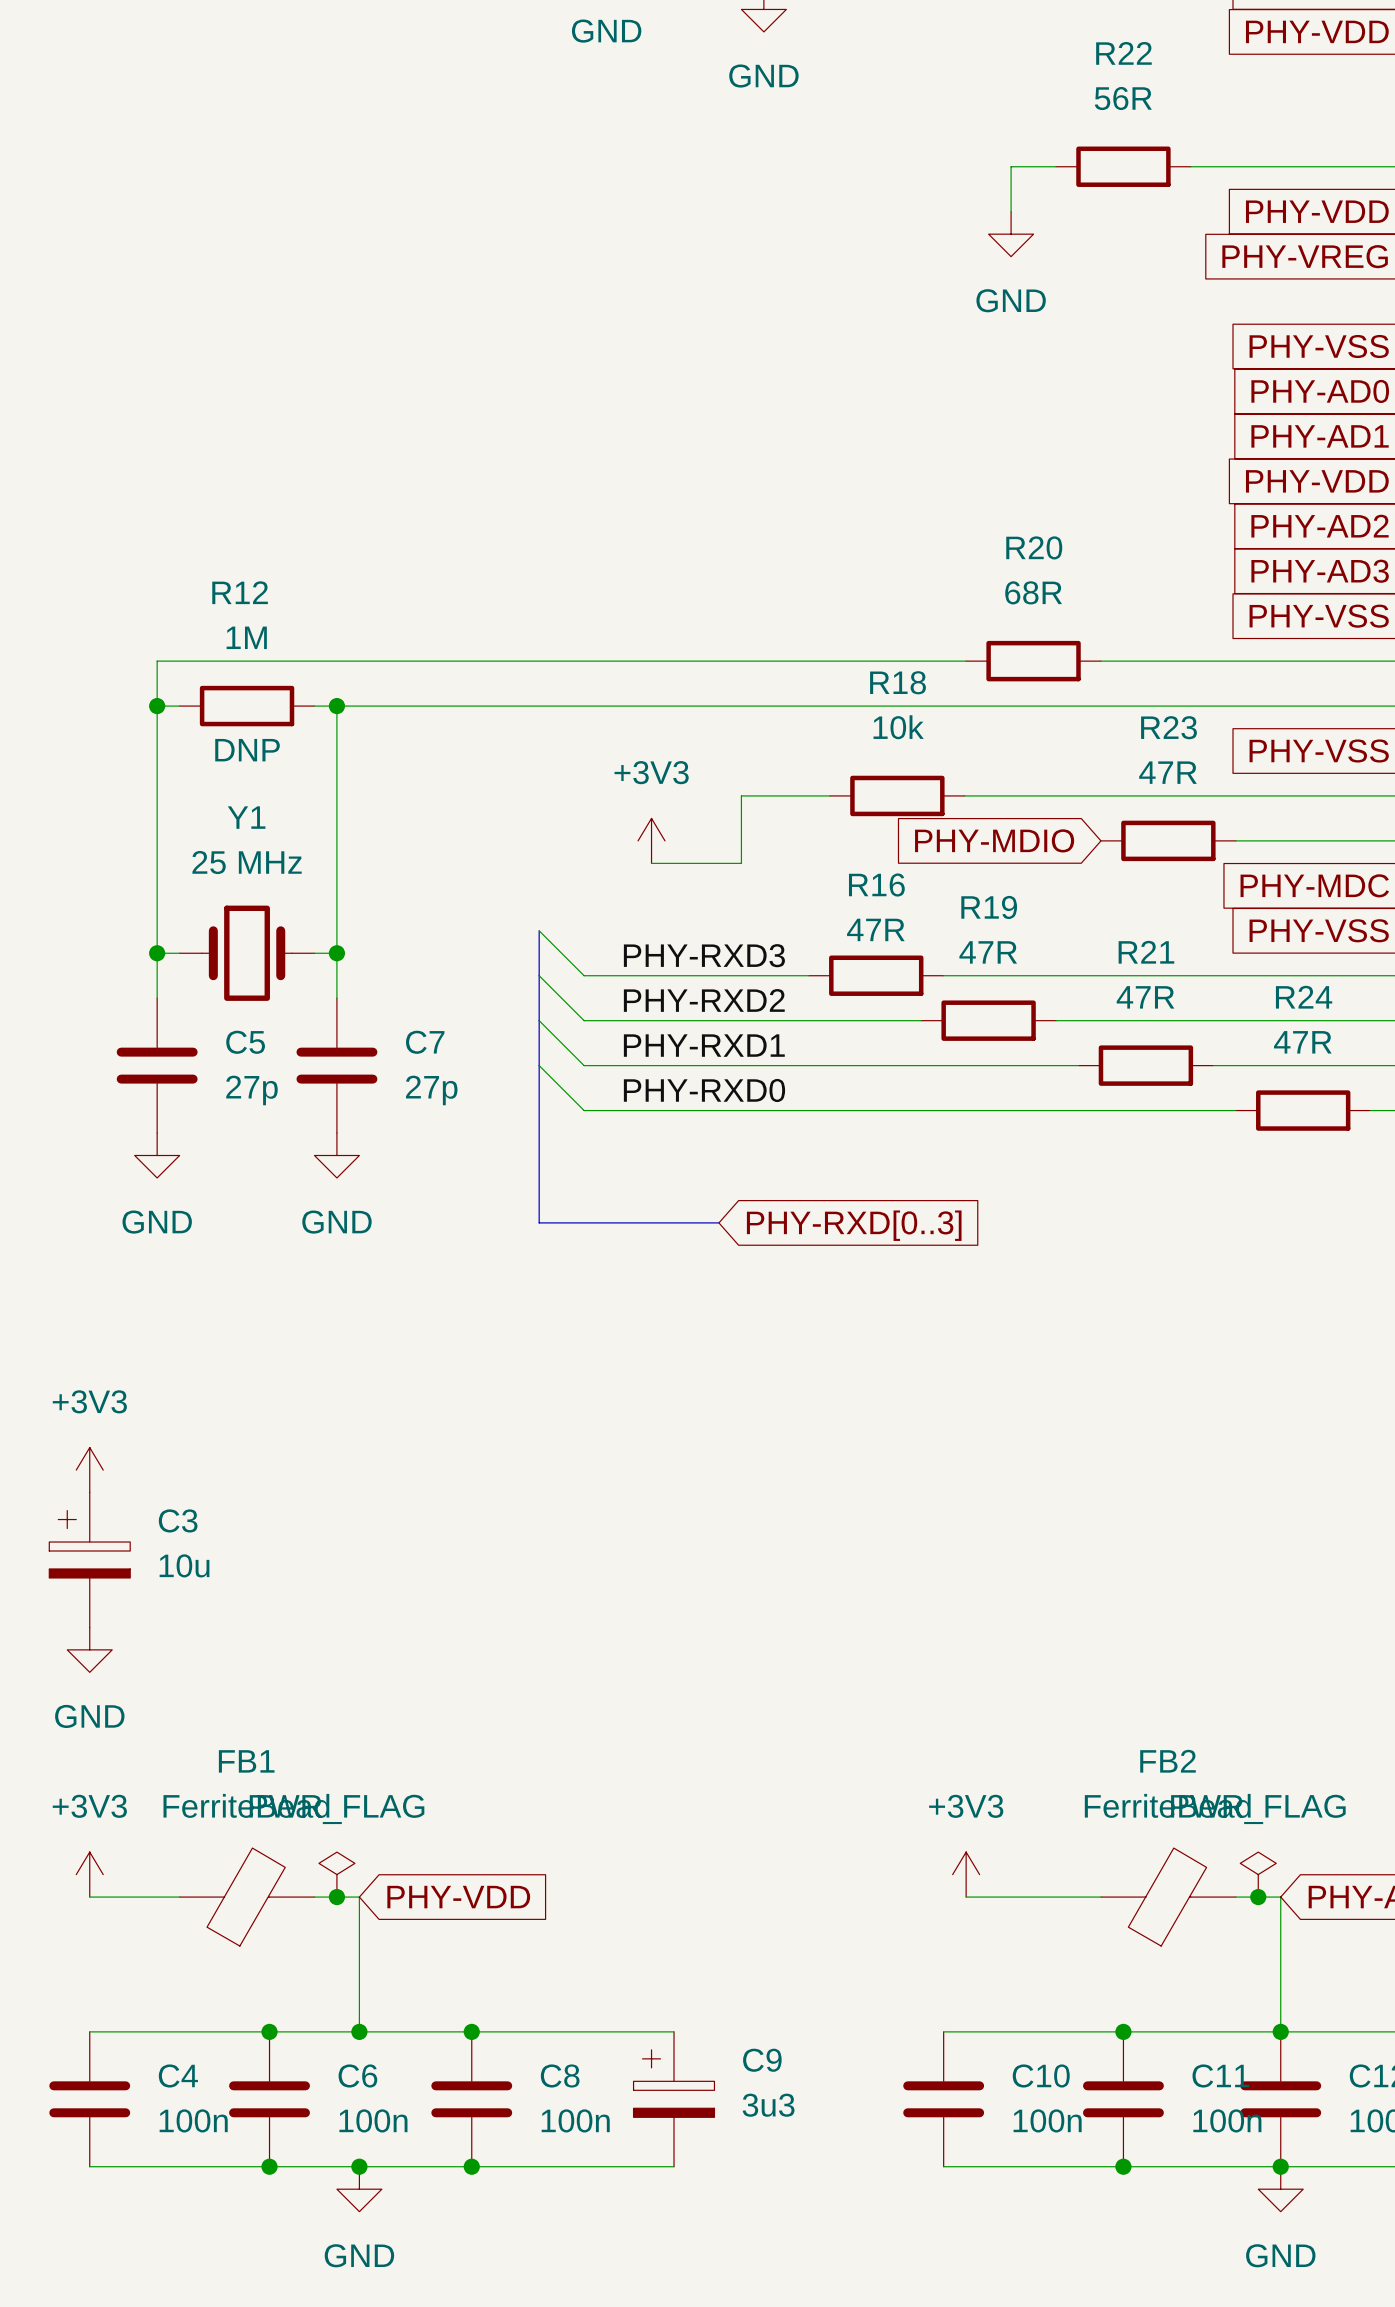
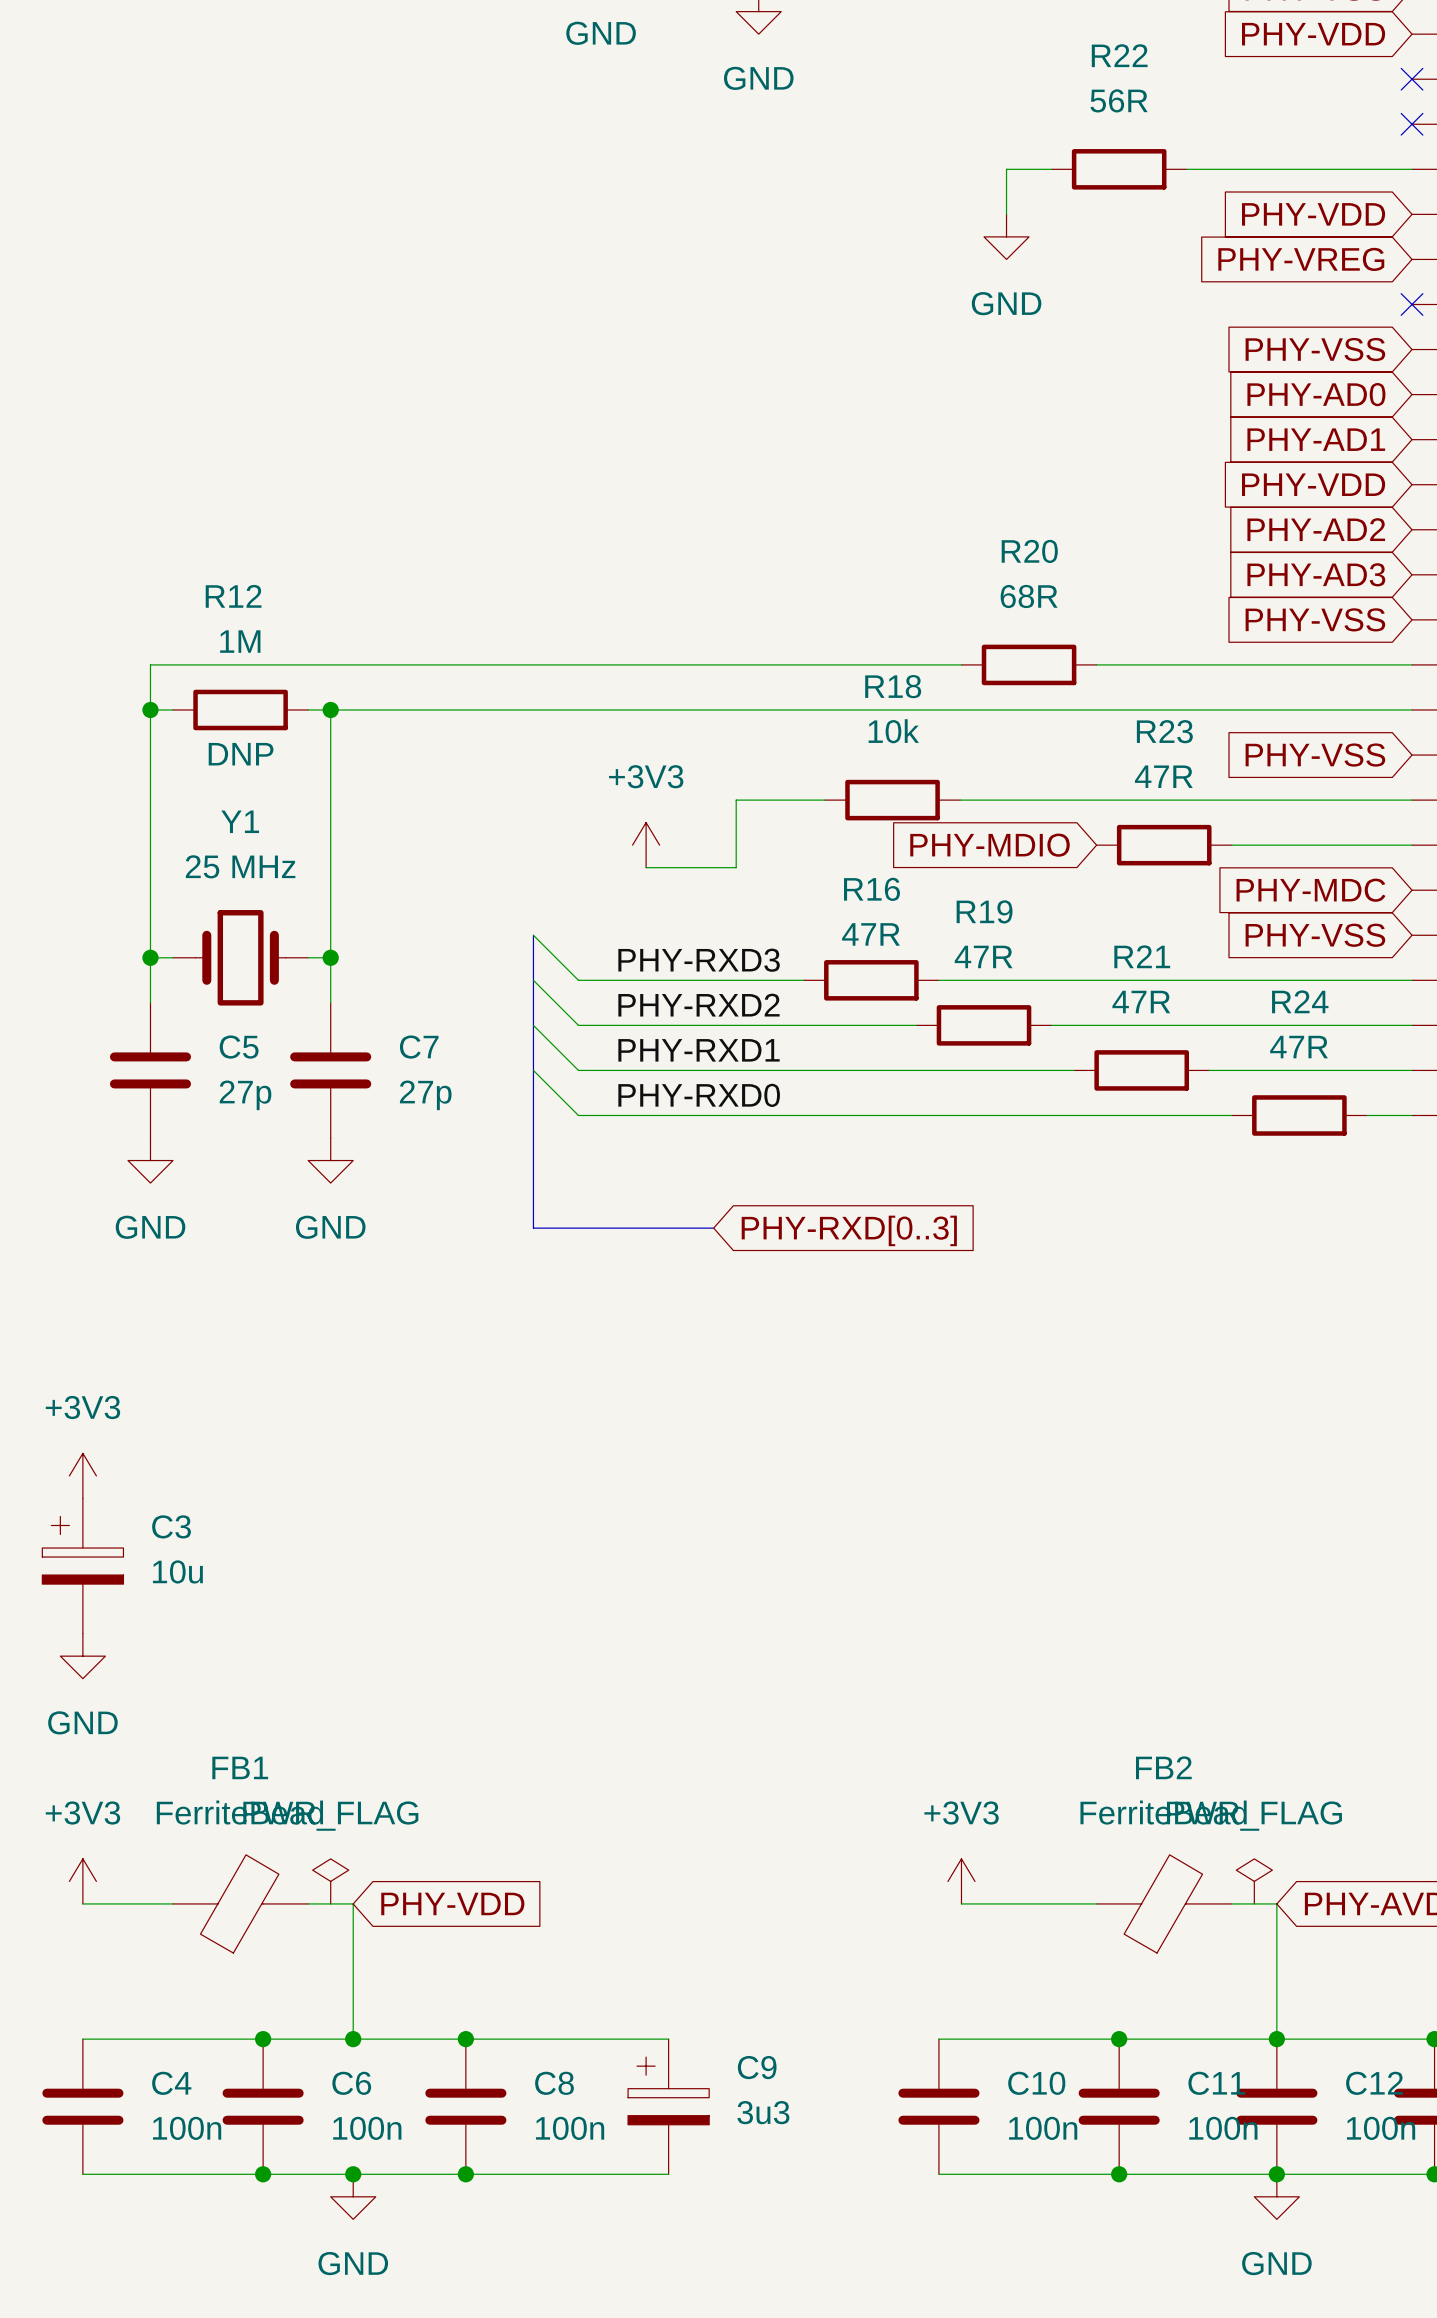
junction: (336, 1897) -> none
junction: (1258, 1897) -> none

